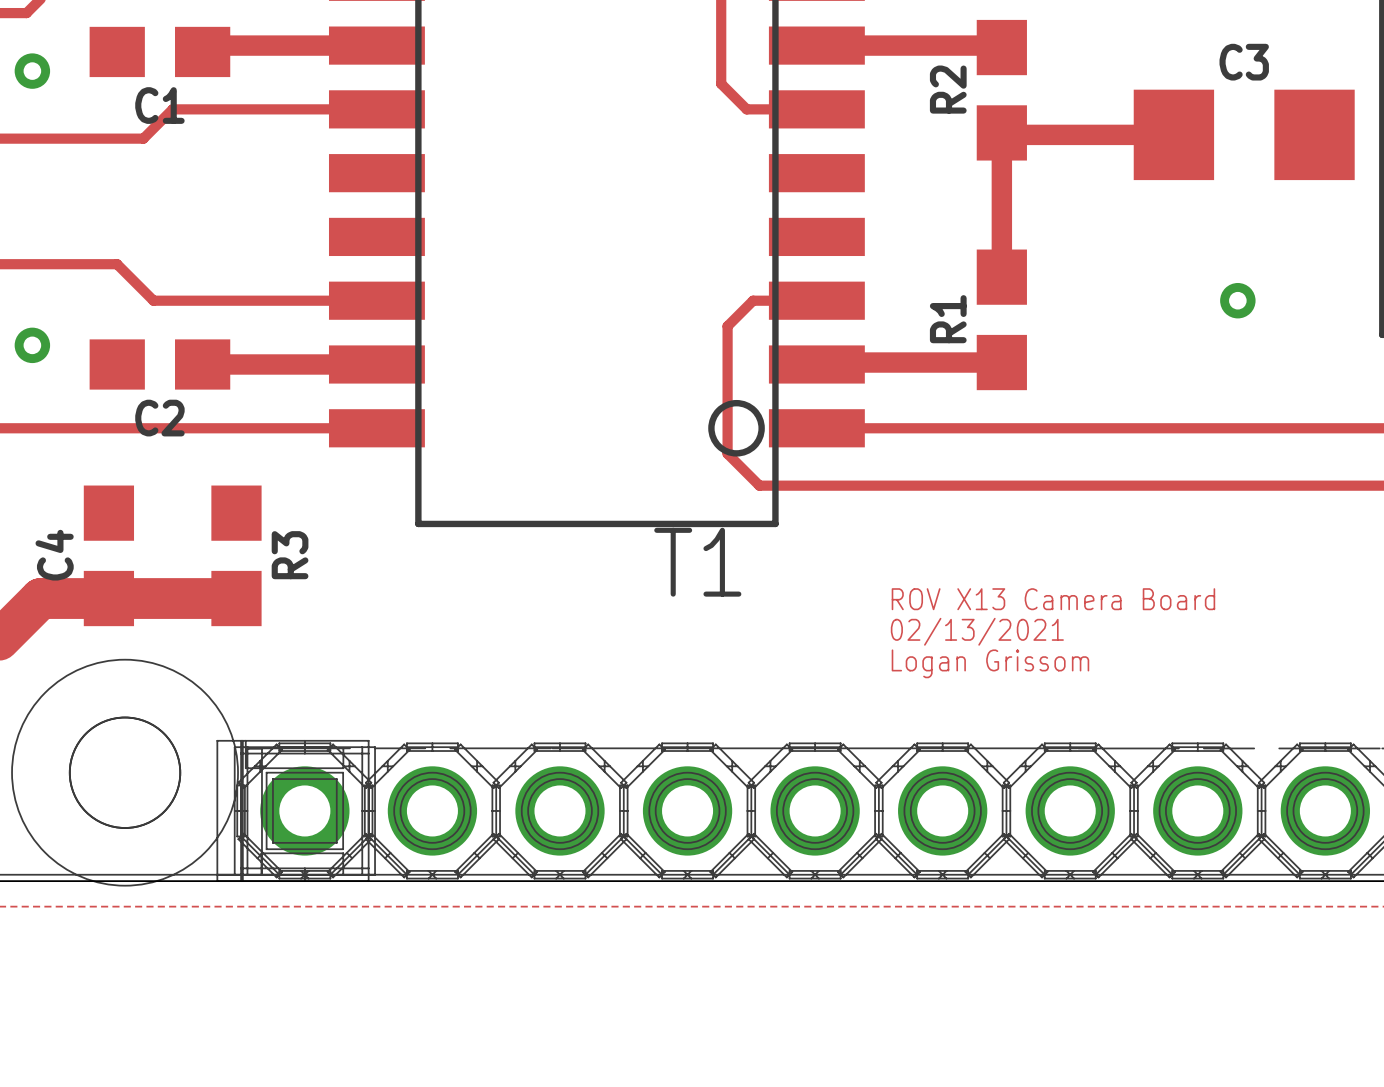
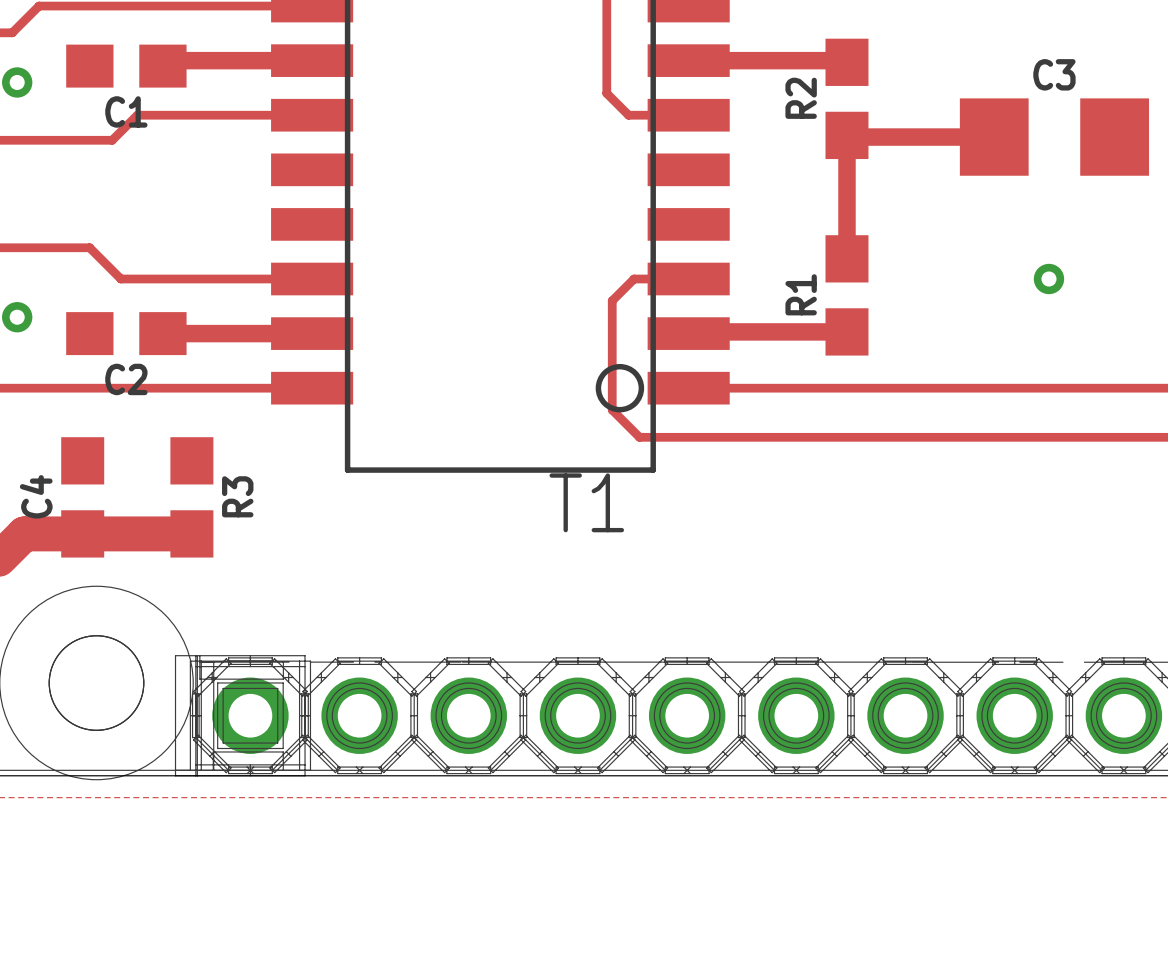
text: ROV X13 Camera Board (1053, 599) -> none
text: 02/13/2021 (977, 631) -> none
text: Logan Grissom (990, 663) -> none

